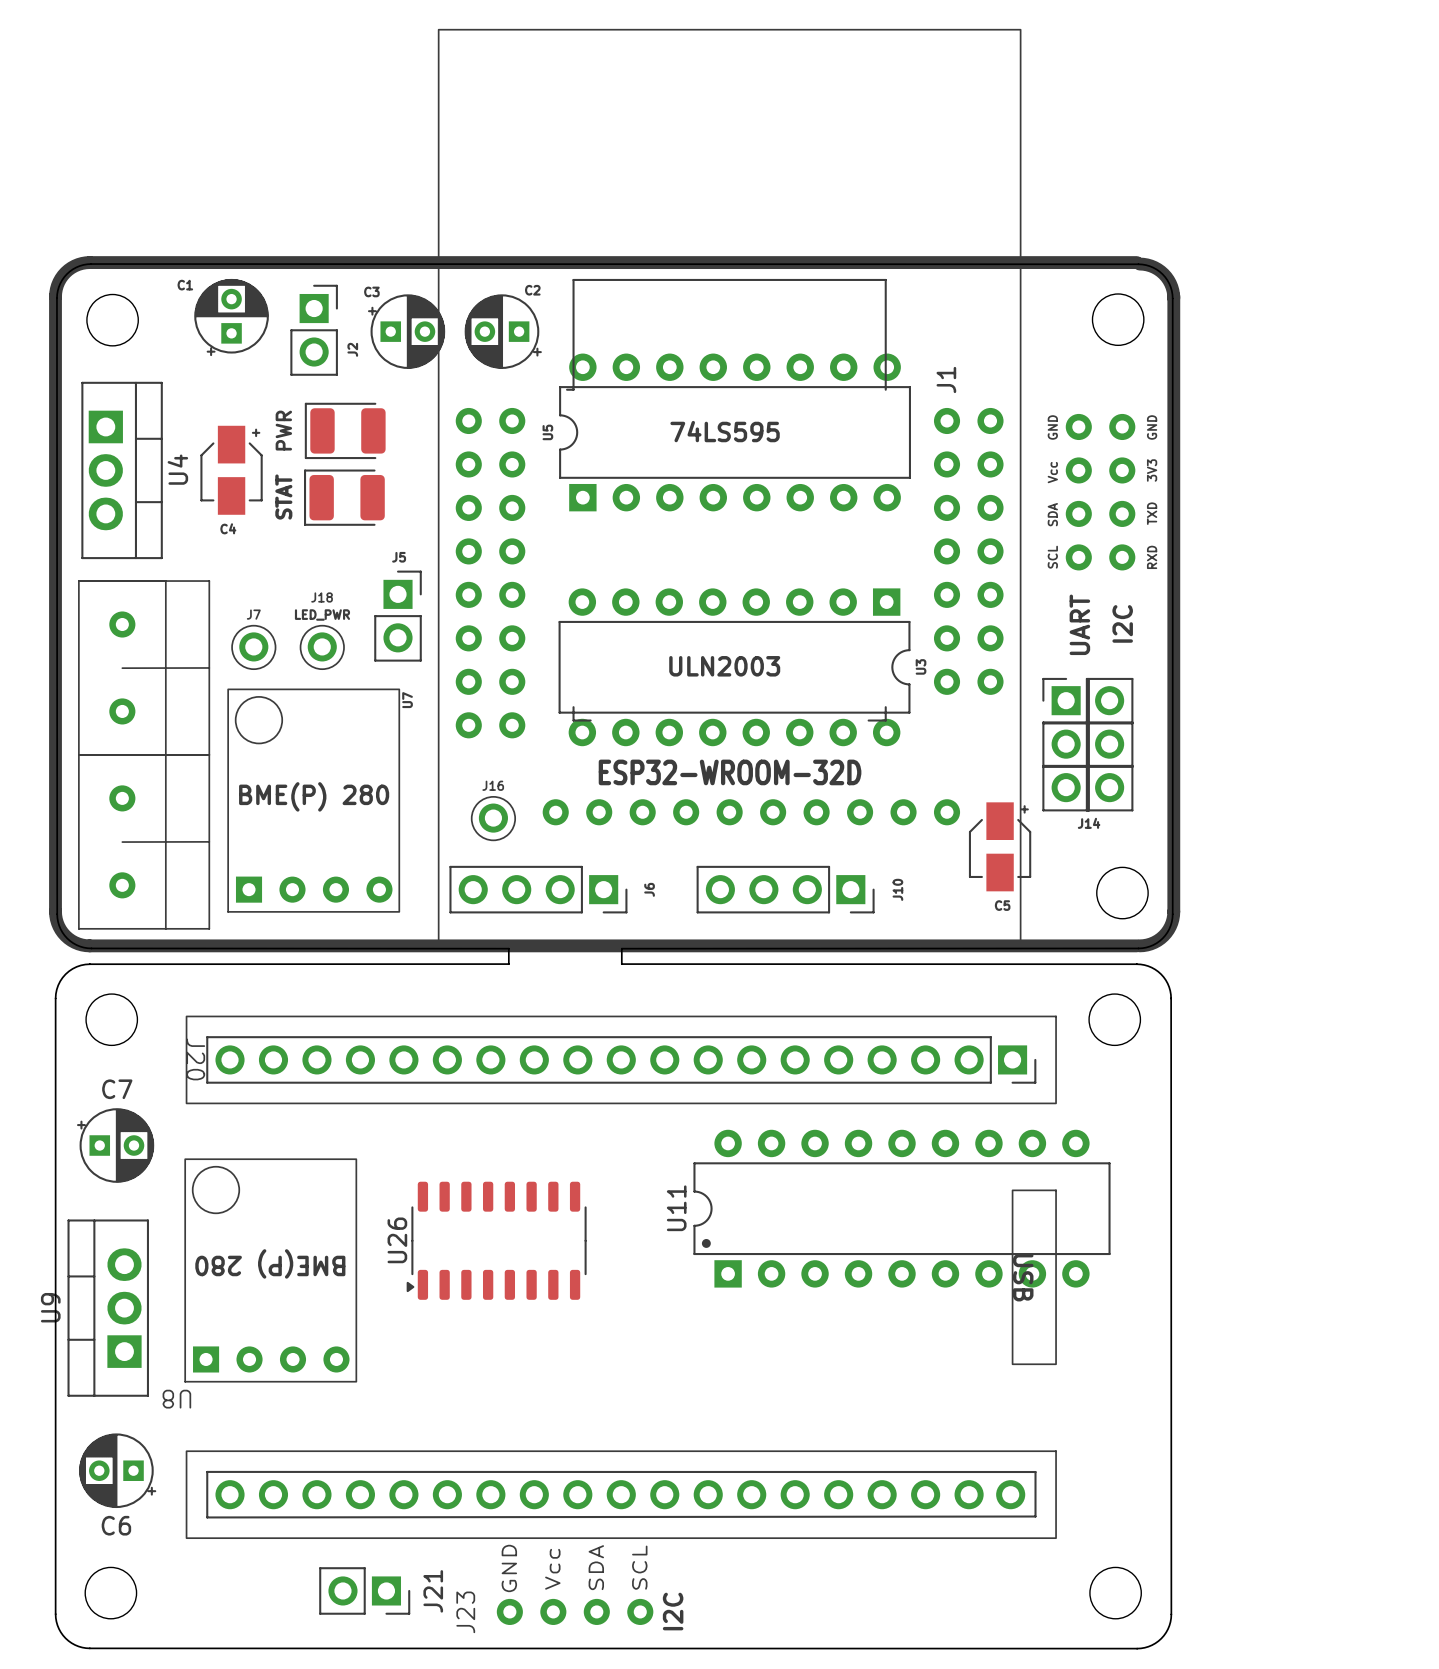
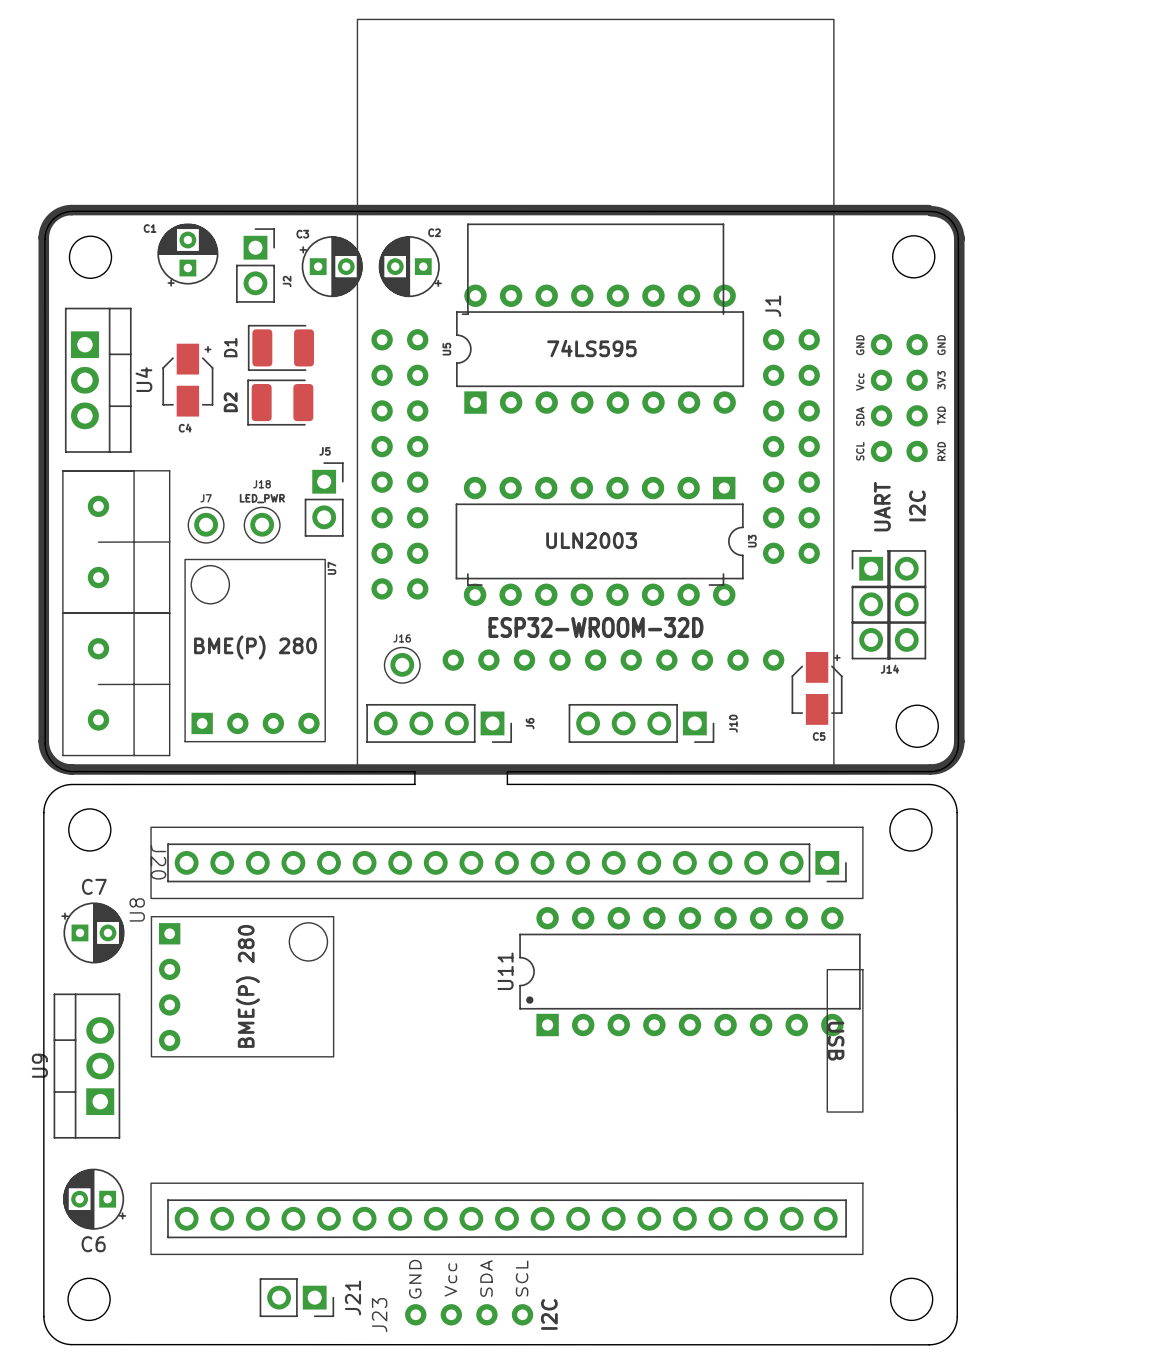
PWR name: PWR (283, 430) -> D1 (230, 347)
STAT name: STAT (283, 497) -> D2 (230, 402)
U11 position: (902, 1208) -> (689, 971)
U26: (496, 1240) -> none
U8 rotation: 0° (270, 1270) -> 90° clockwise (242, 986)

